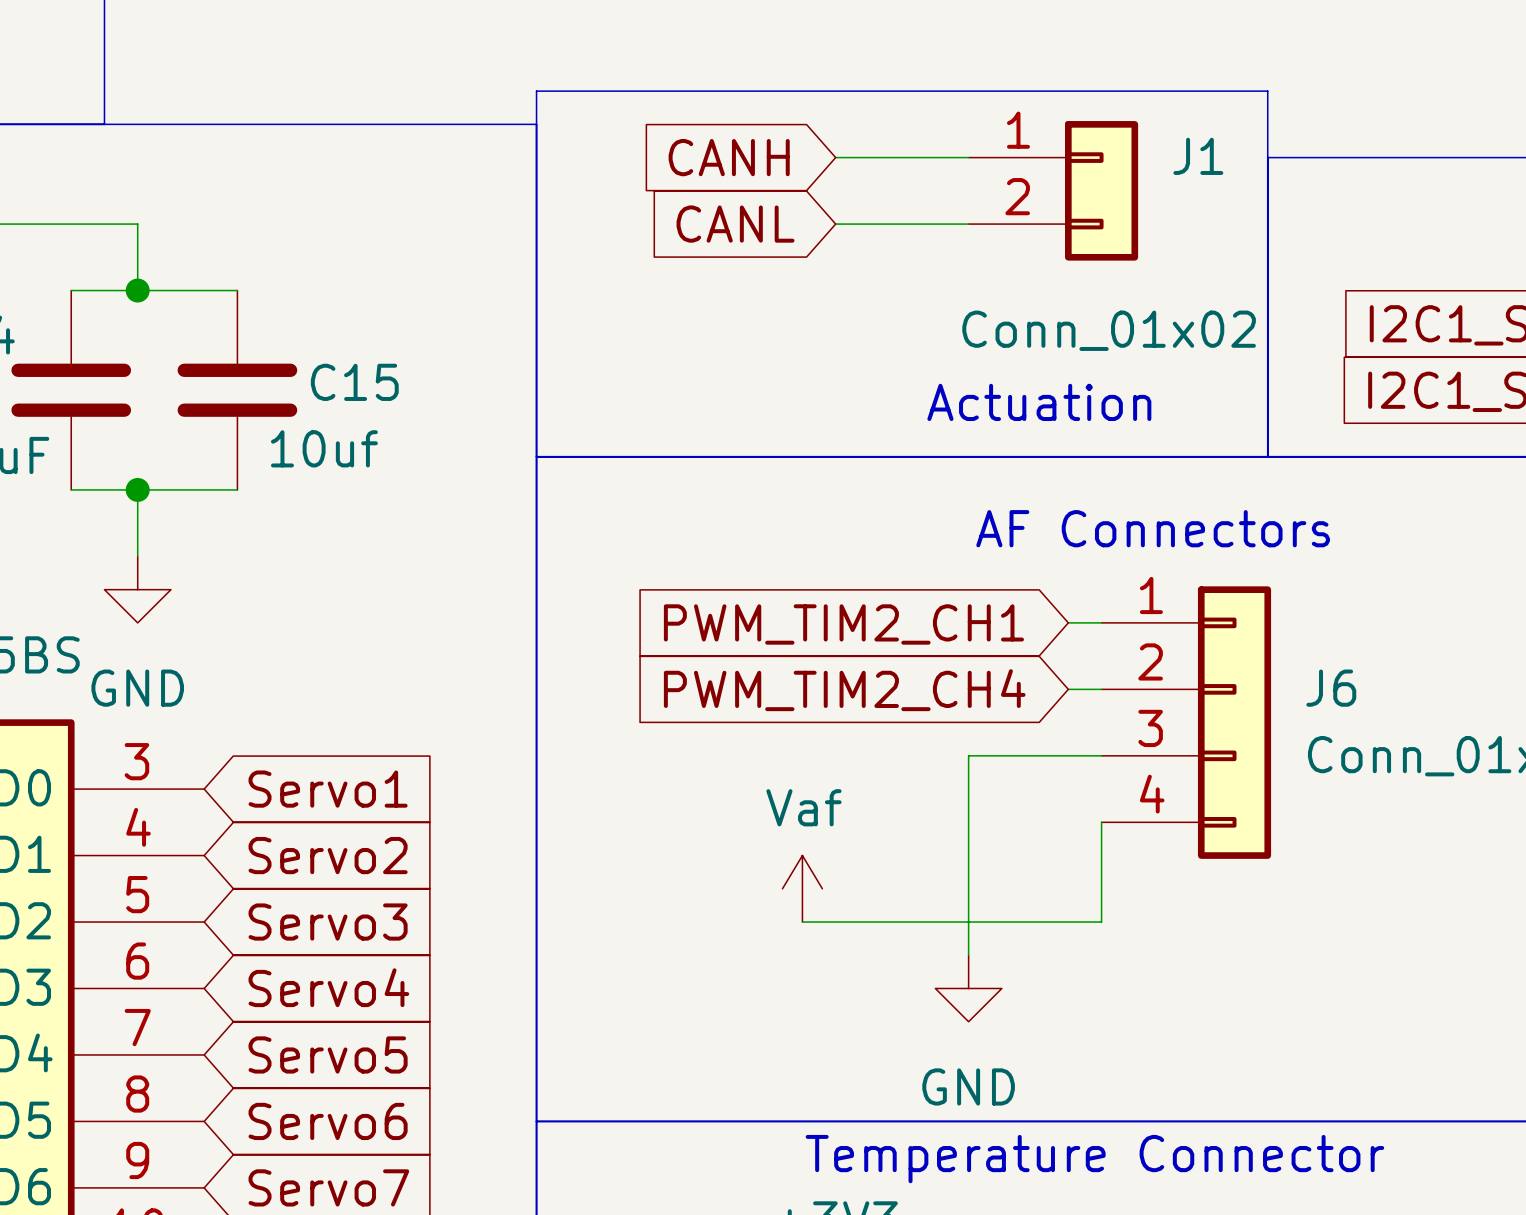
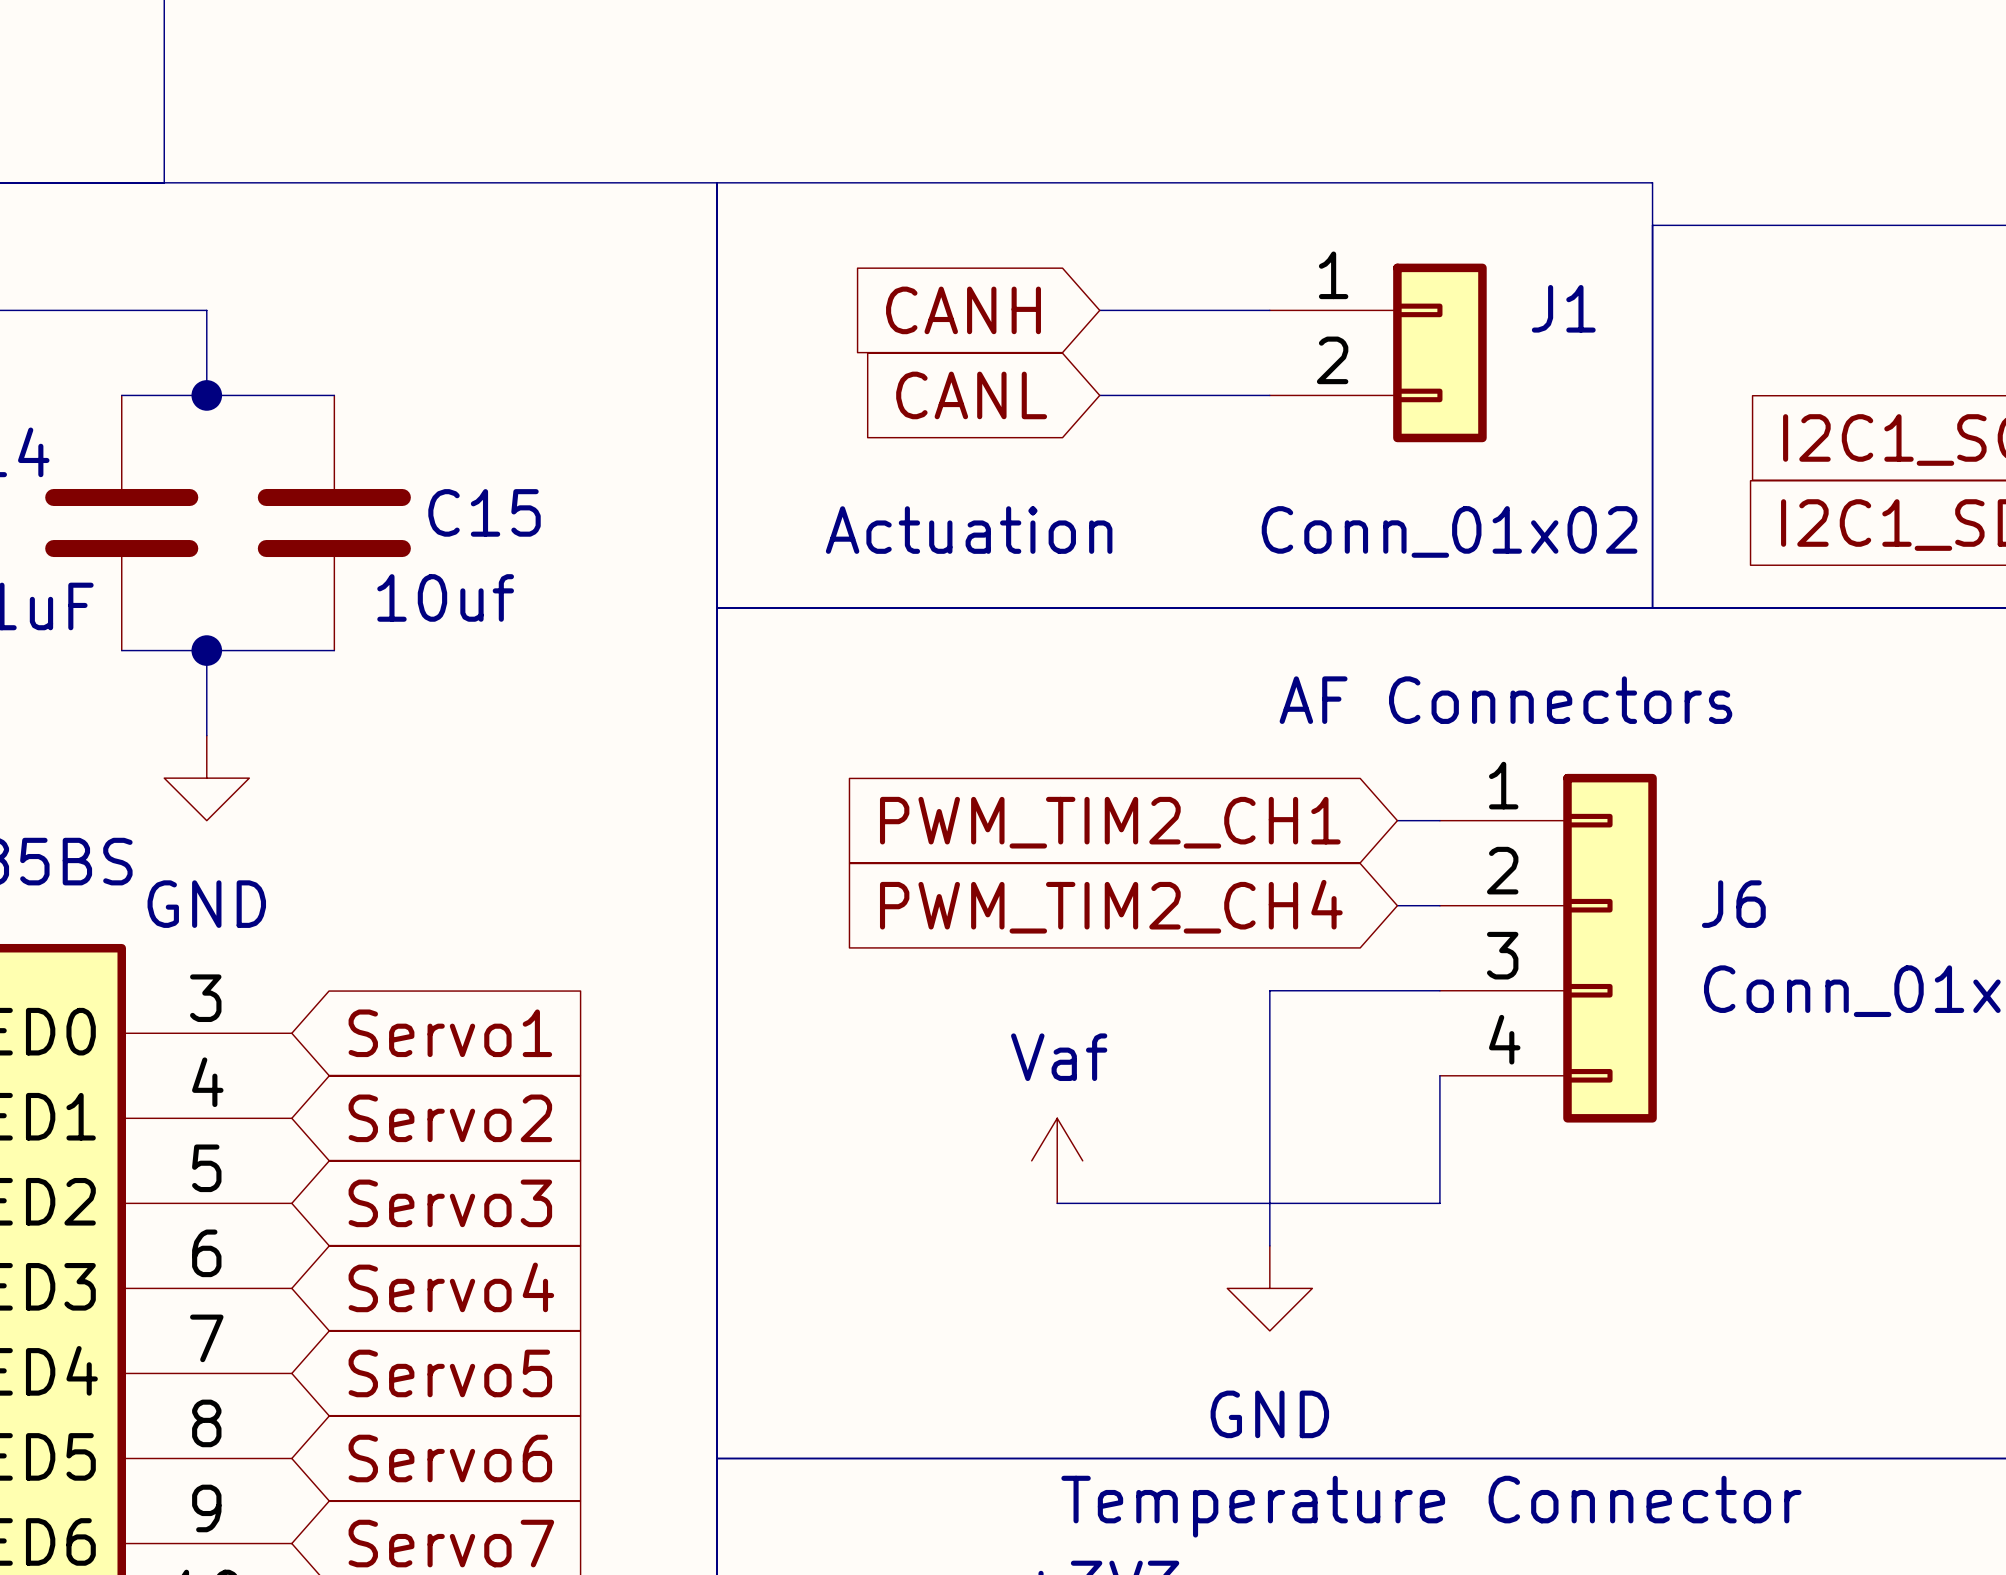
line: (536, 124) (536, 91) (1267, 91) (1267, 124) -> (717, 182) (1652, 182)
global label: CANH (729, 157) -> none
wire: (835, 157) (968, 157) -> (1099, 395) (1269, 395)
J1 position: (1053, 190) -> (1378, 352)
global label: CANL (735, 224) -> CANH (963, 310)
global label: none -> CANL (971, 395)
text position: Actuation (1039, 402) -> Actuation (969, 530)

